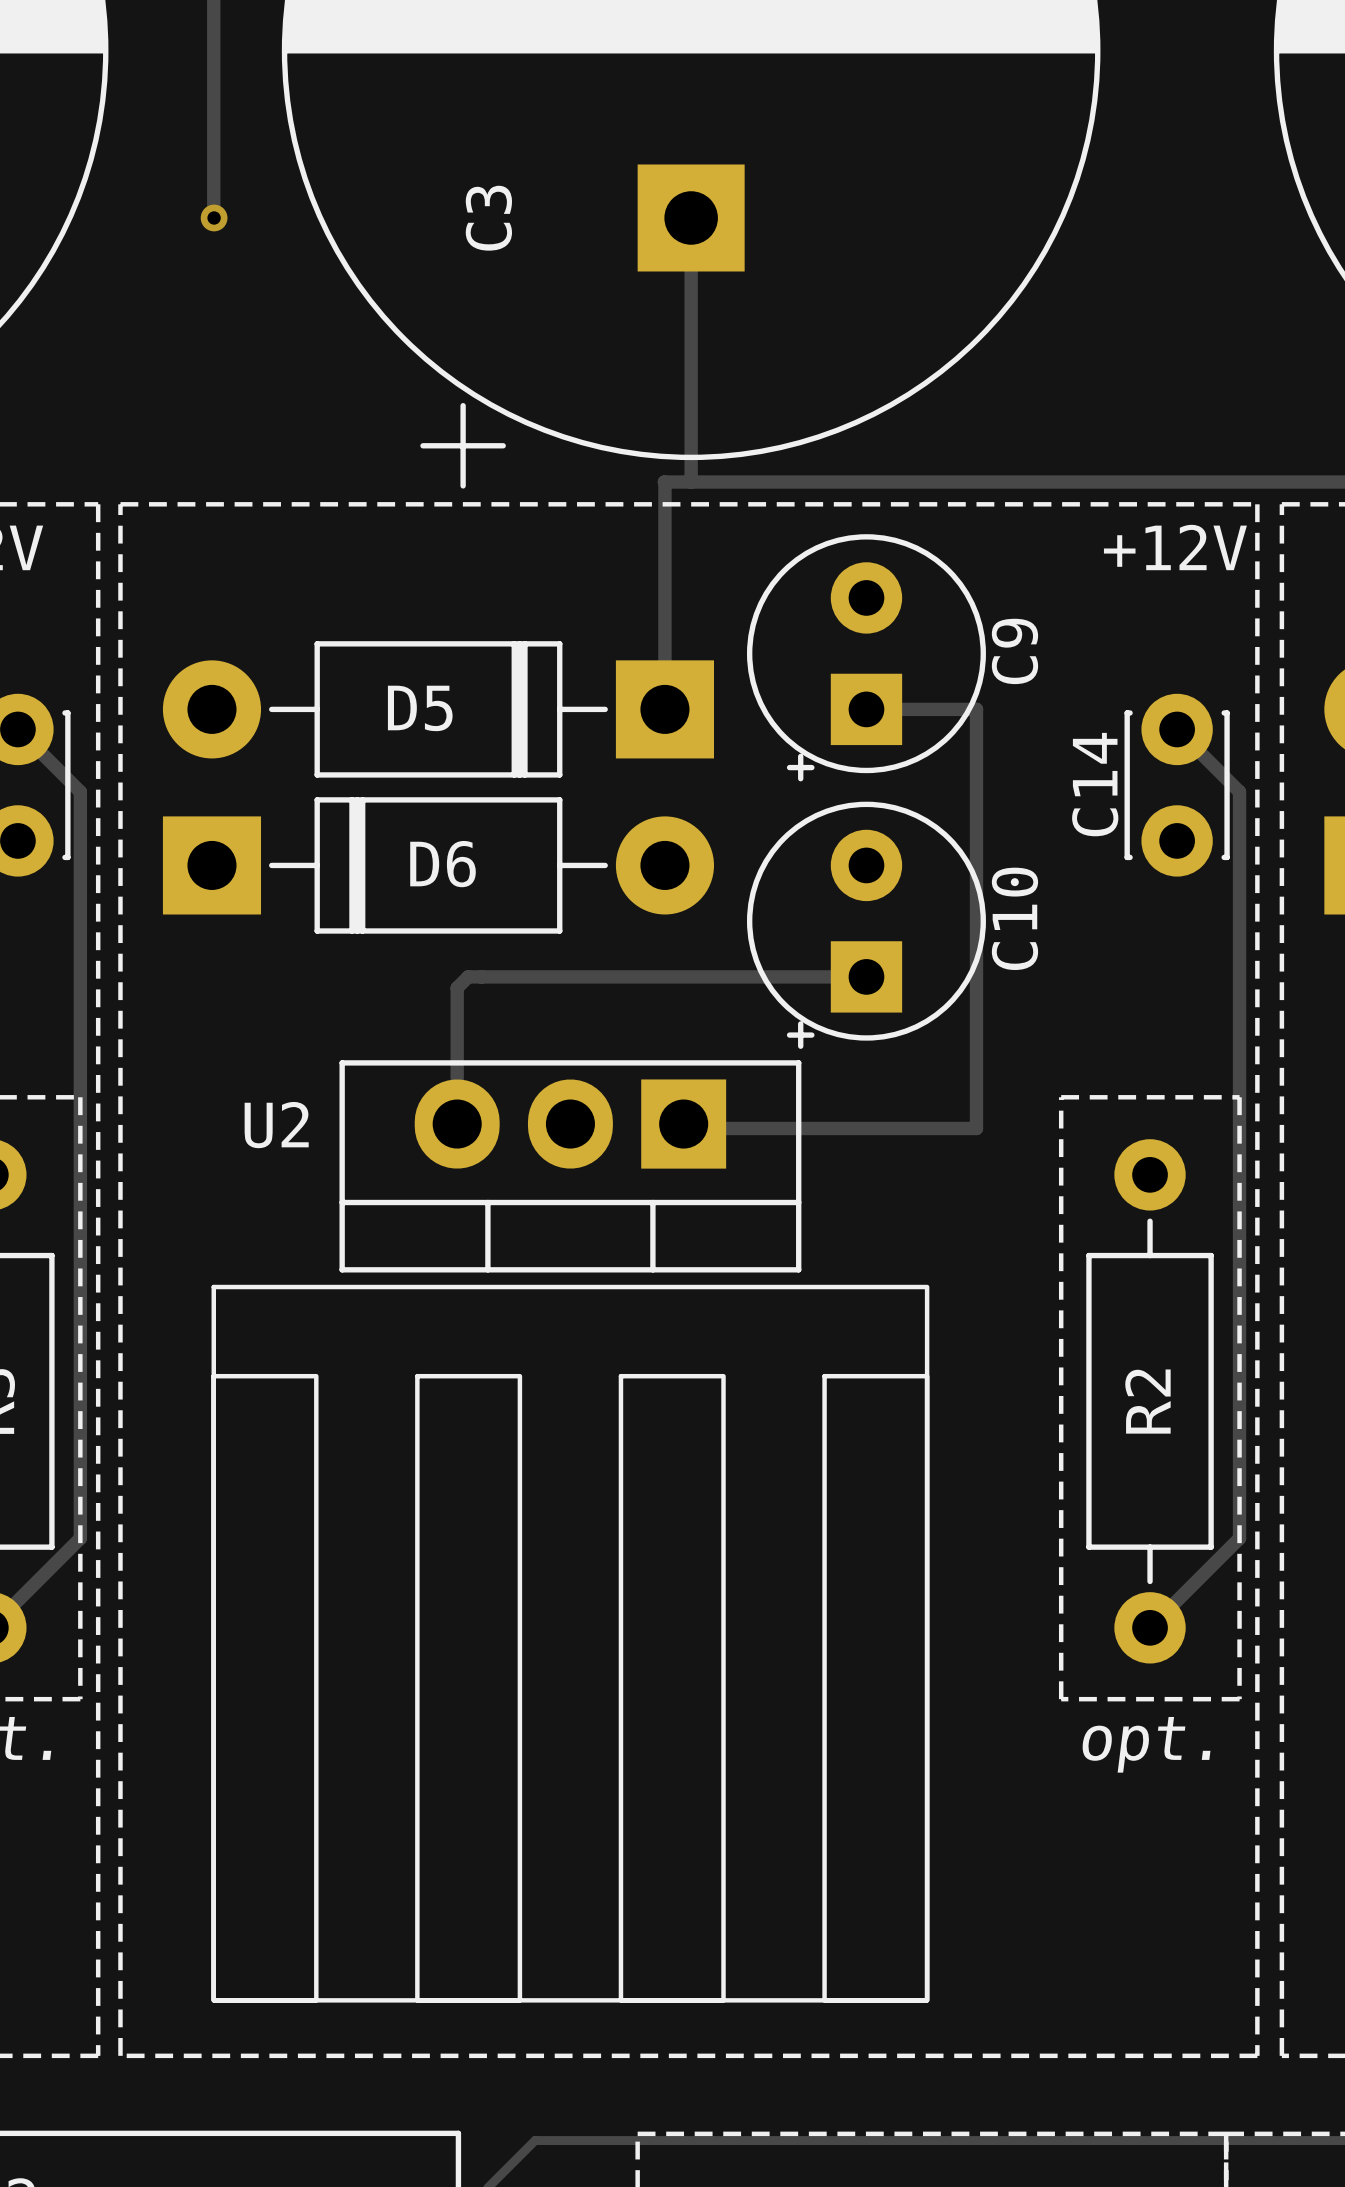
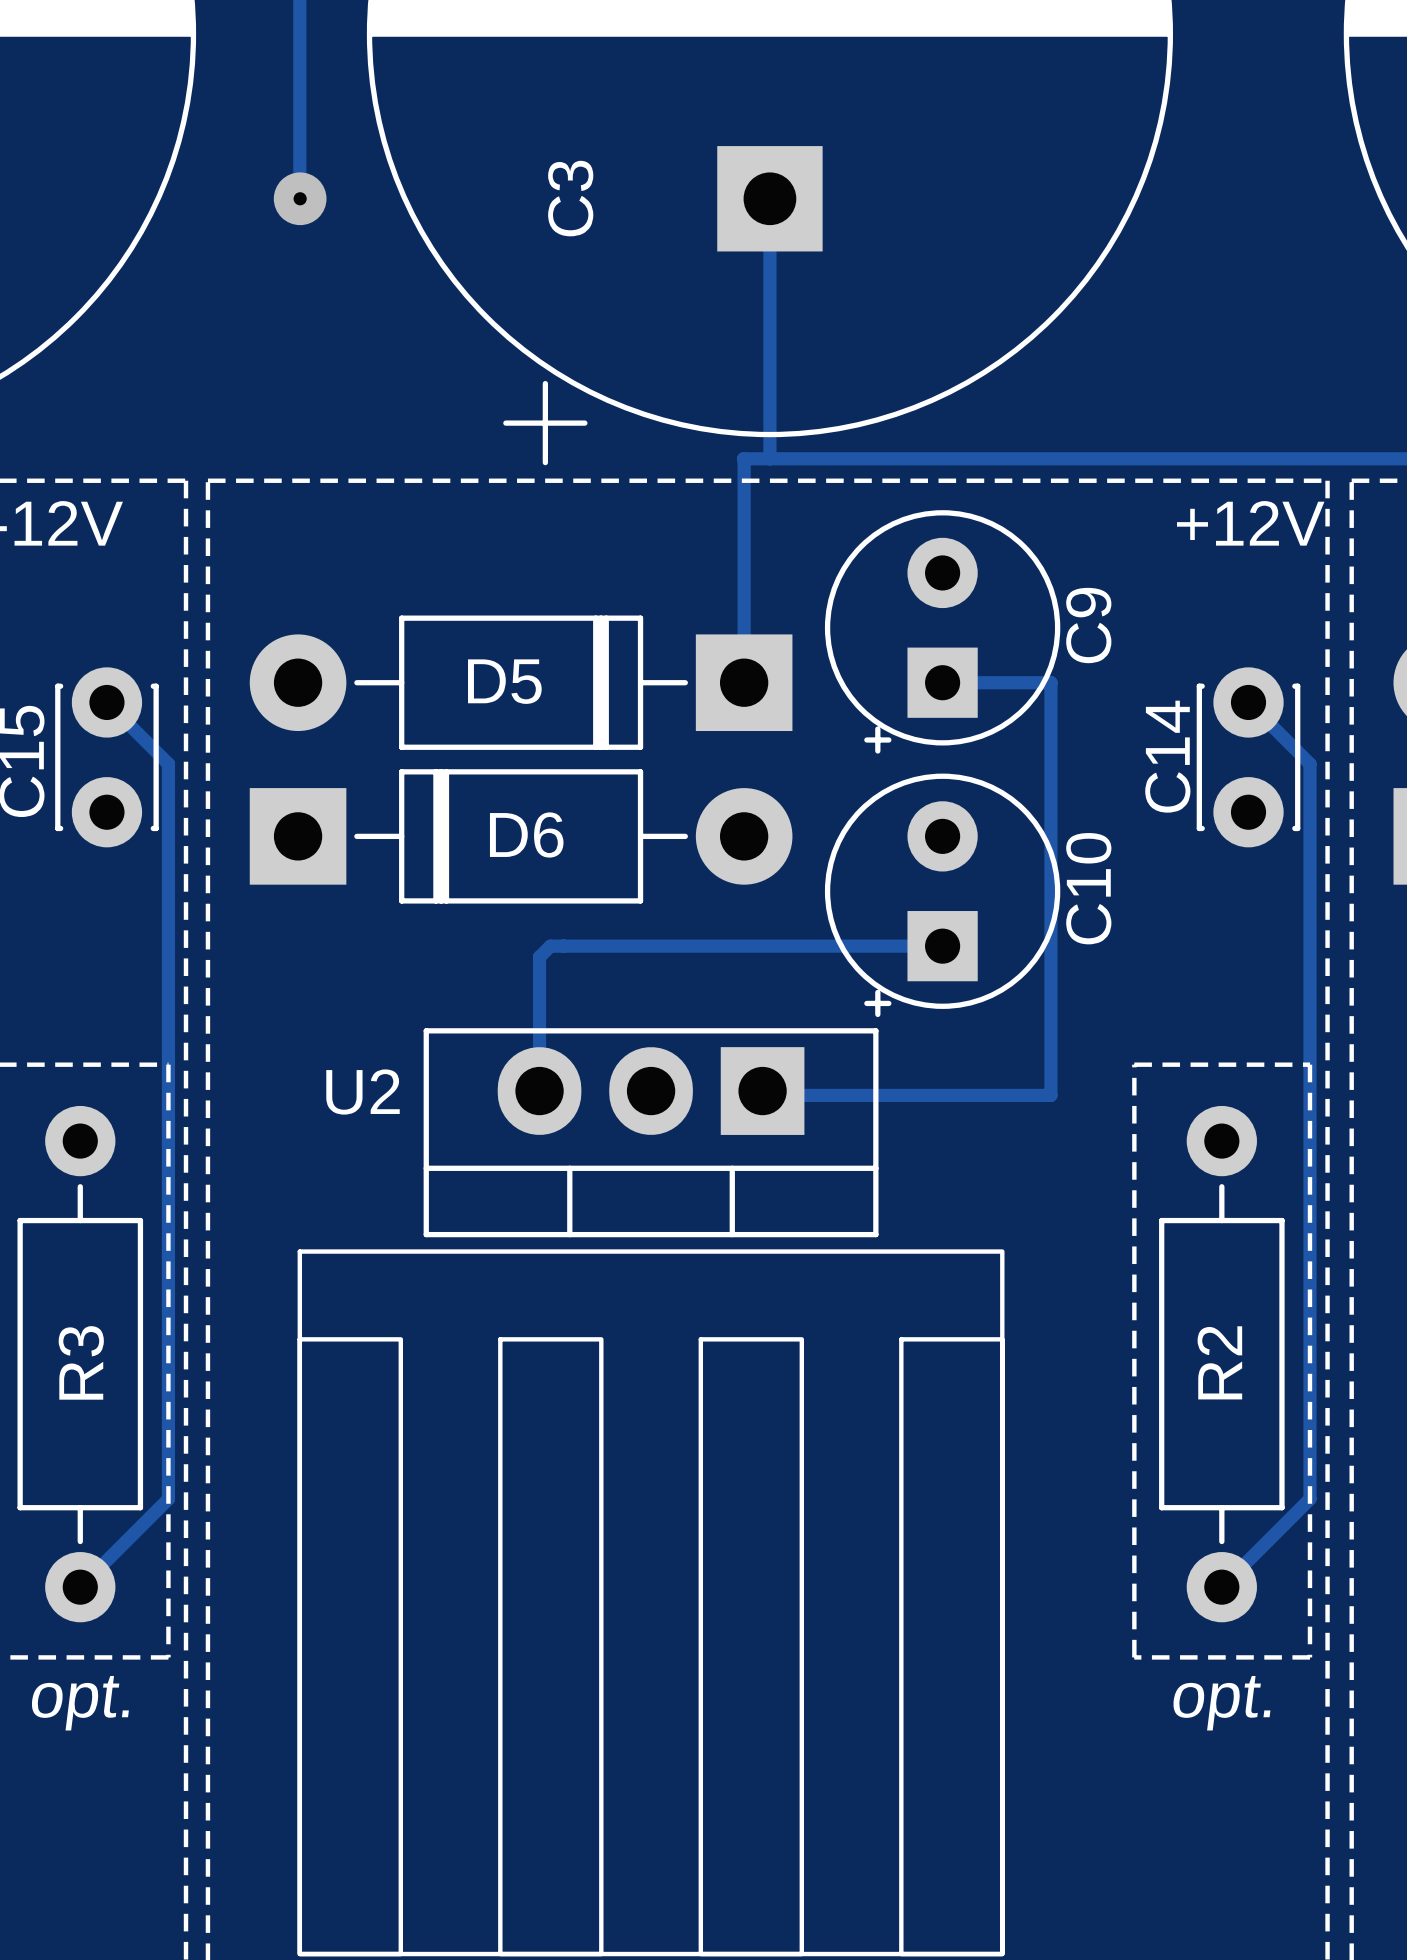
via size: [200, 204, 228, 232] -> [273, 172, 327, 226]

